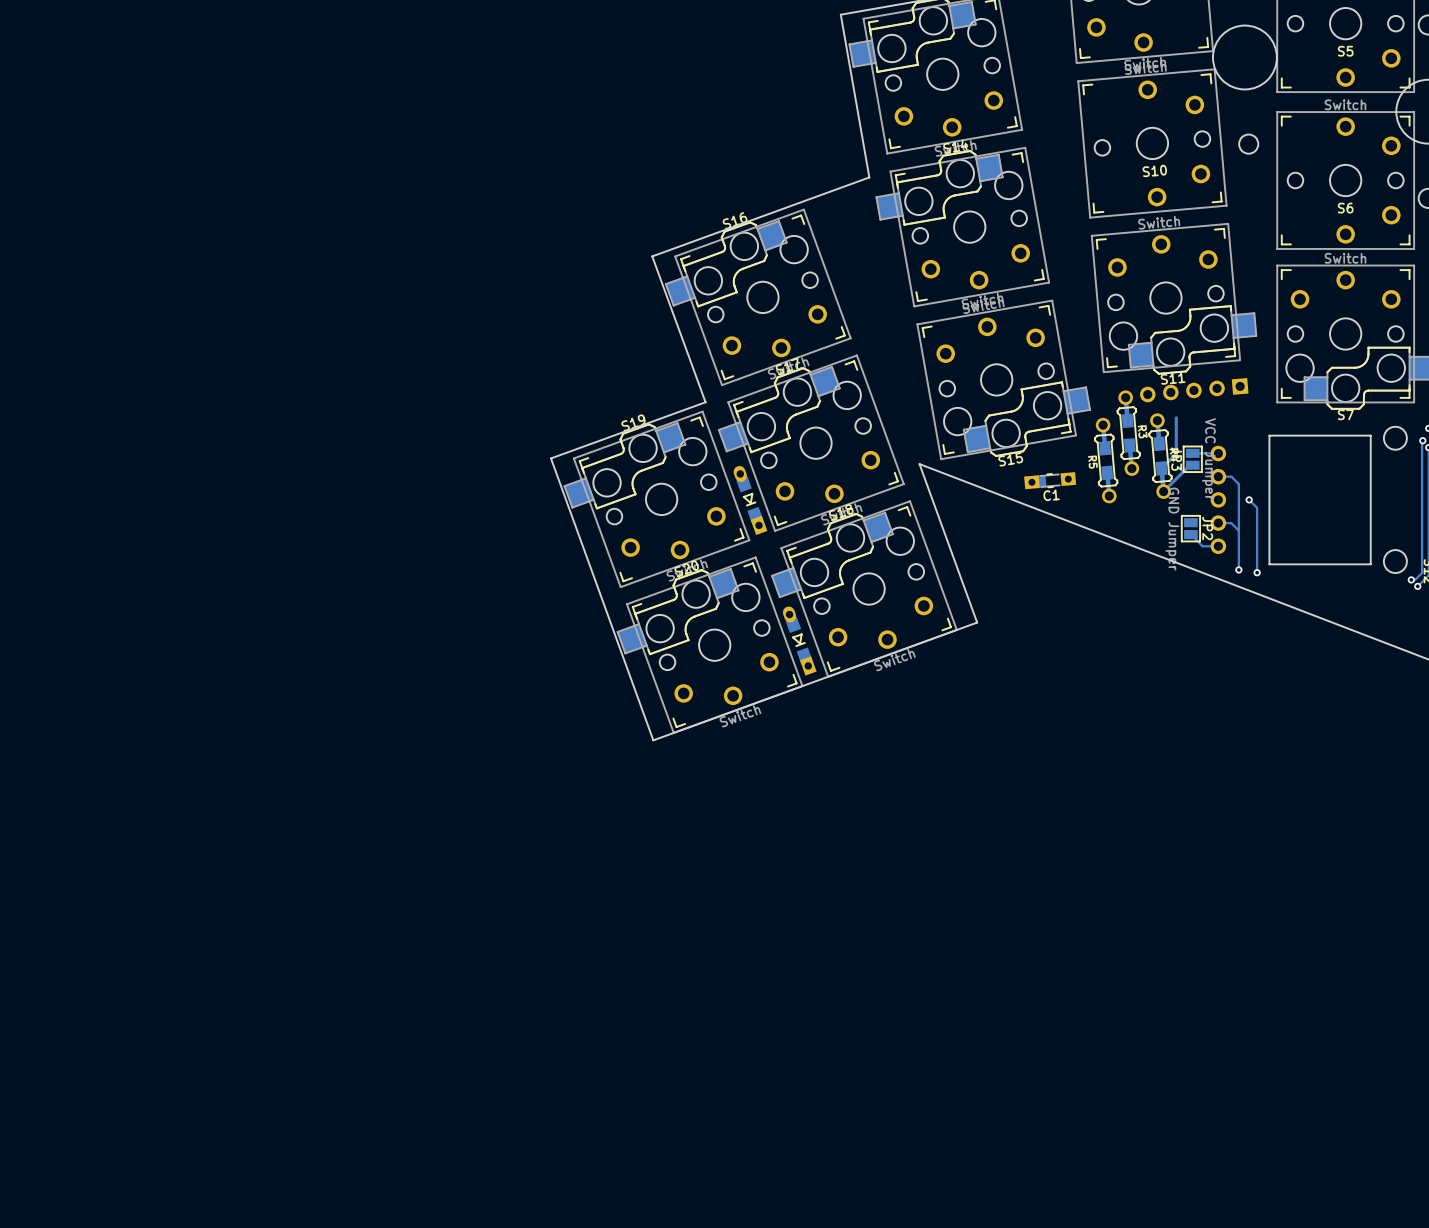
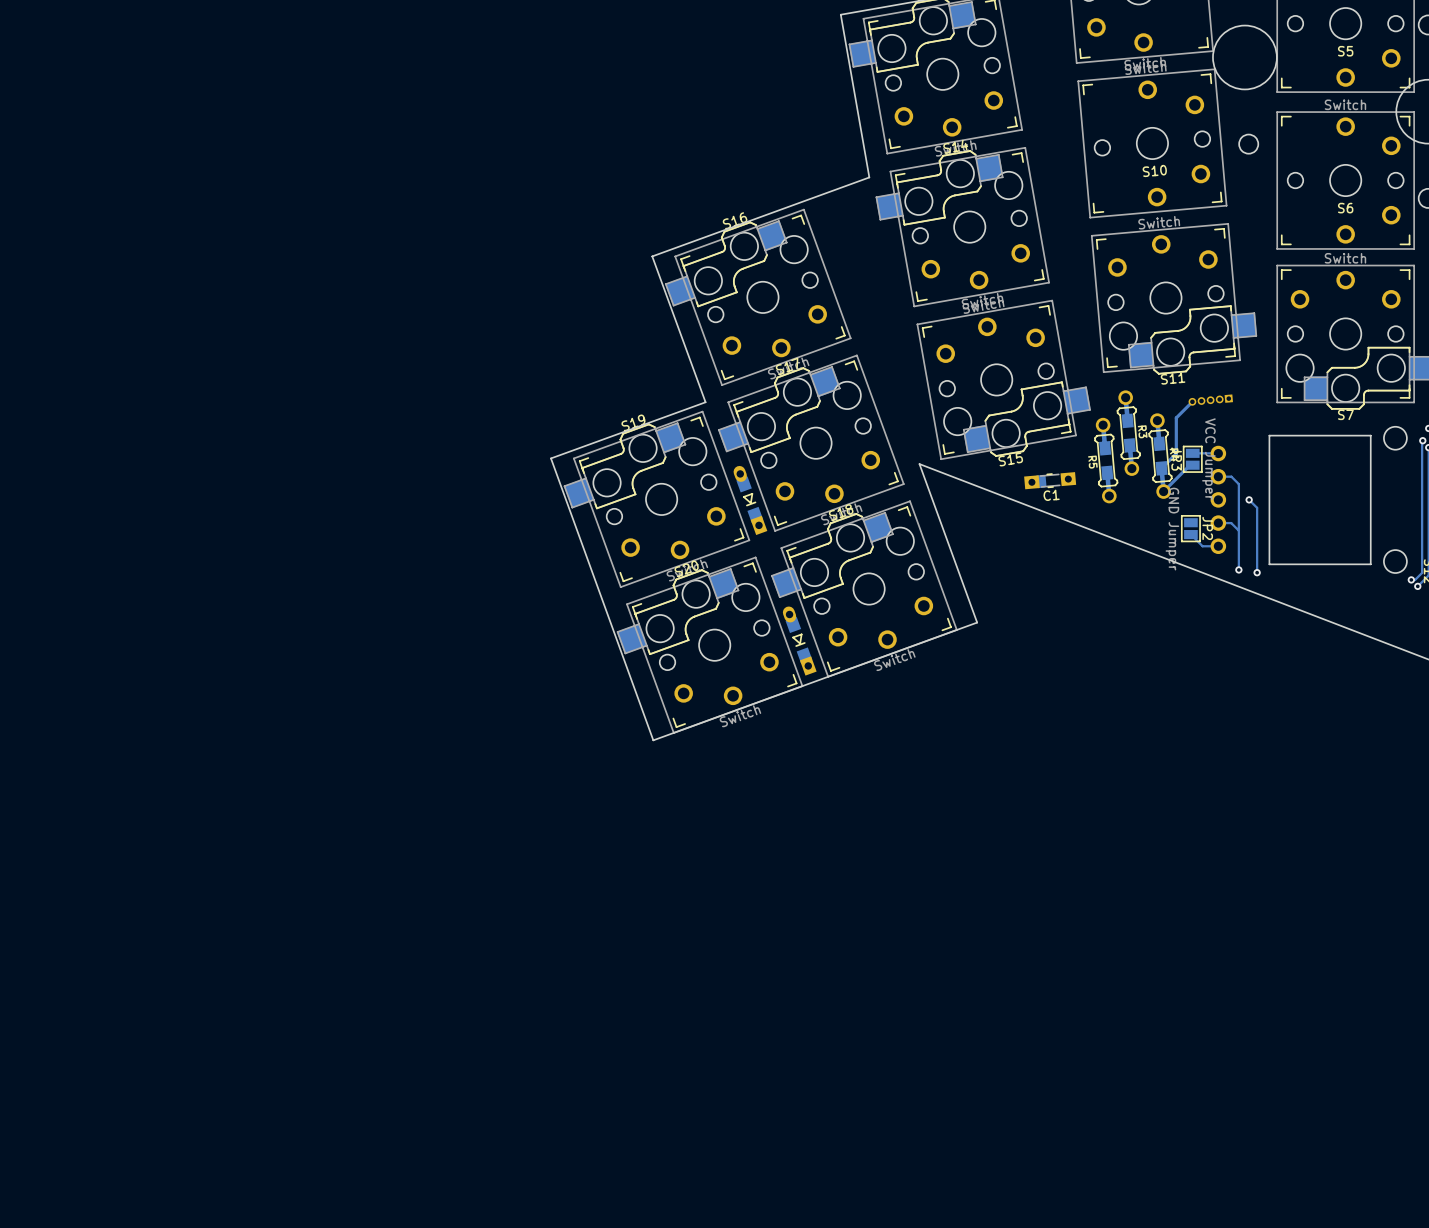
part: (1194, 390) -> none
part: none -> (1210, 400)
track: none -> (1192, 401) (1176, 417)

